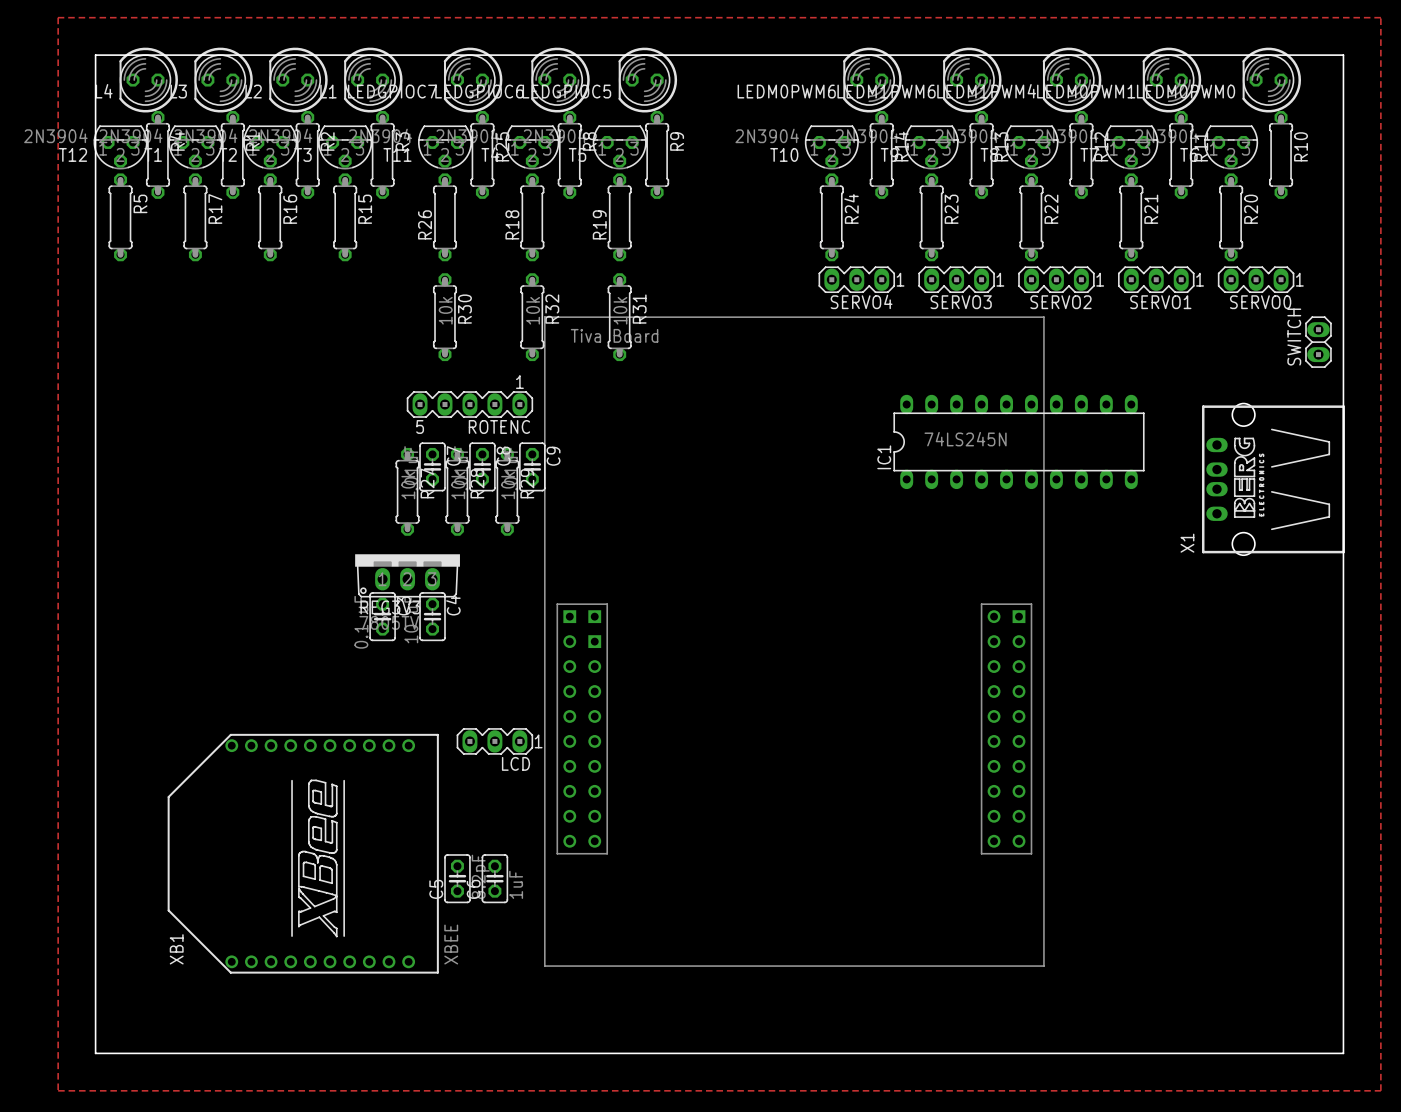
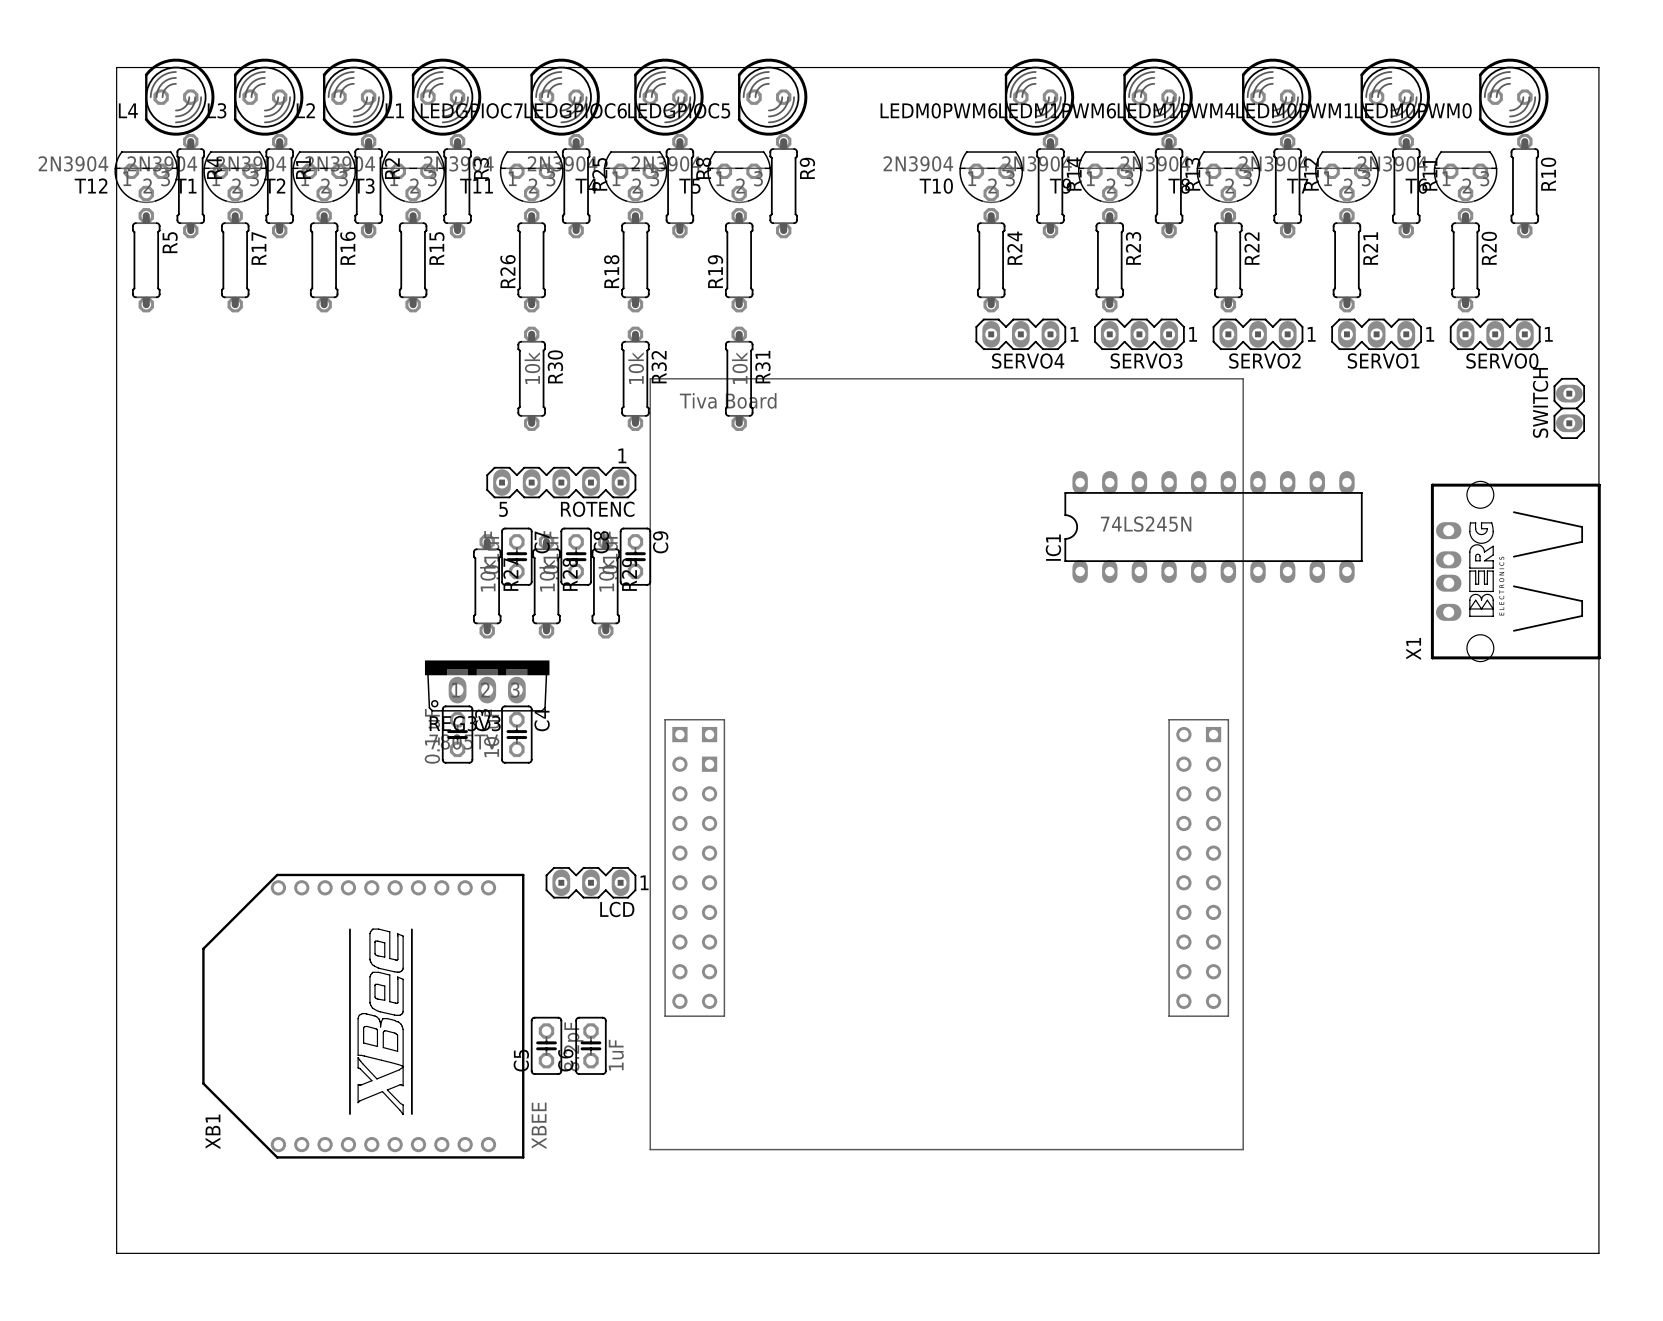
zone outline: (58, 17) (58, 1090) (1380, 1090) (1380, 17) (58, 17) -> none

